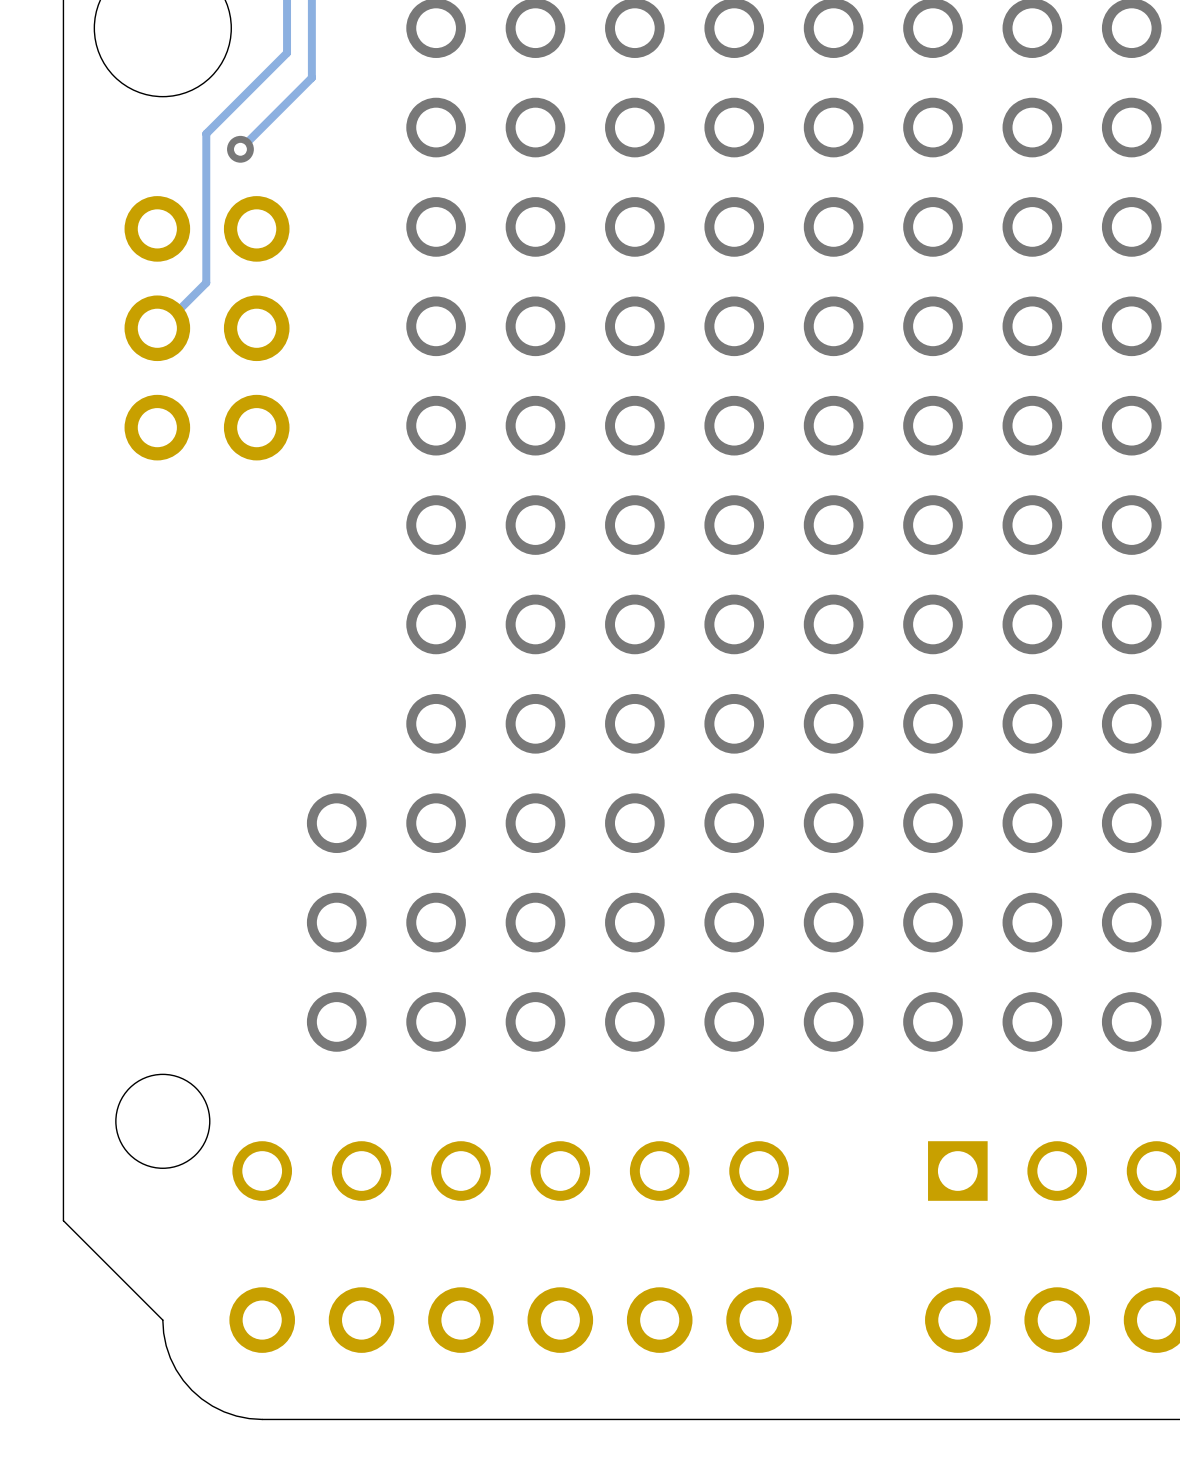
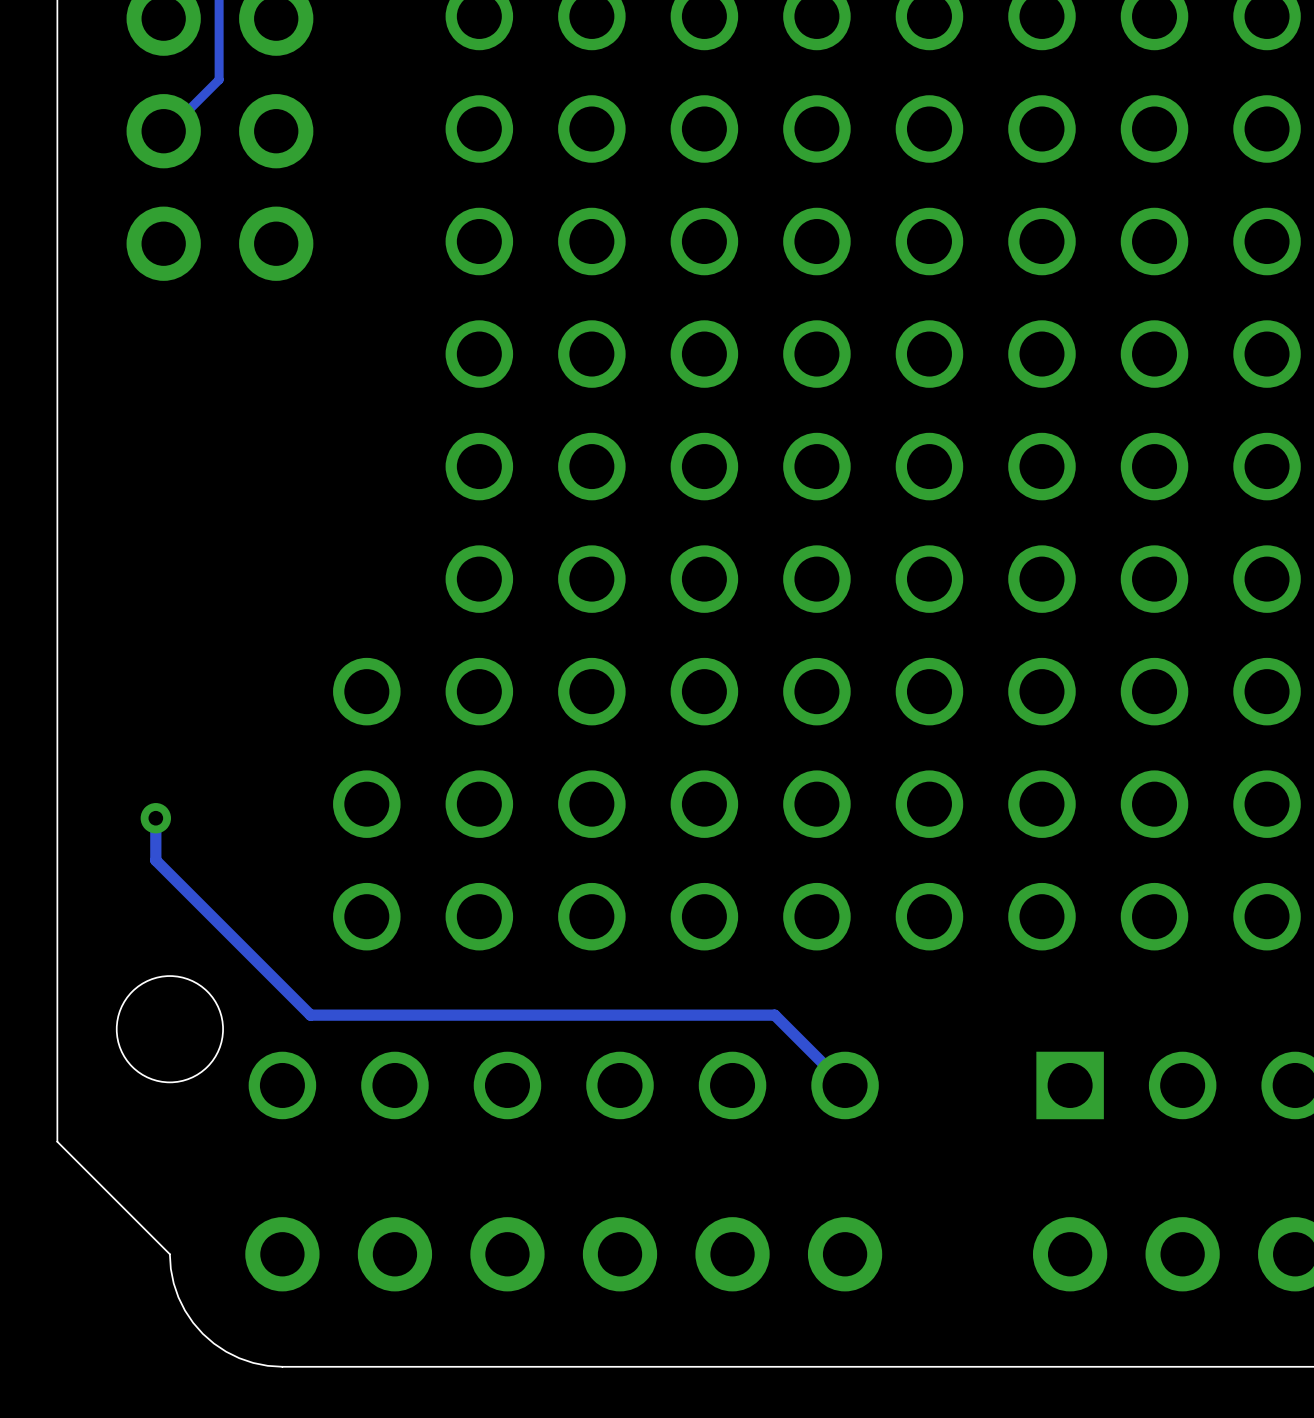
track: none -> (155, 818) (155, 860) (310, 1015) (774, 1015) (845, 1085)
via: none -> (155, 818)

